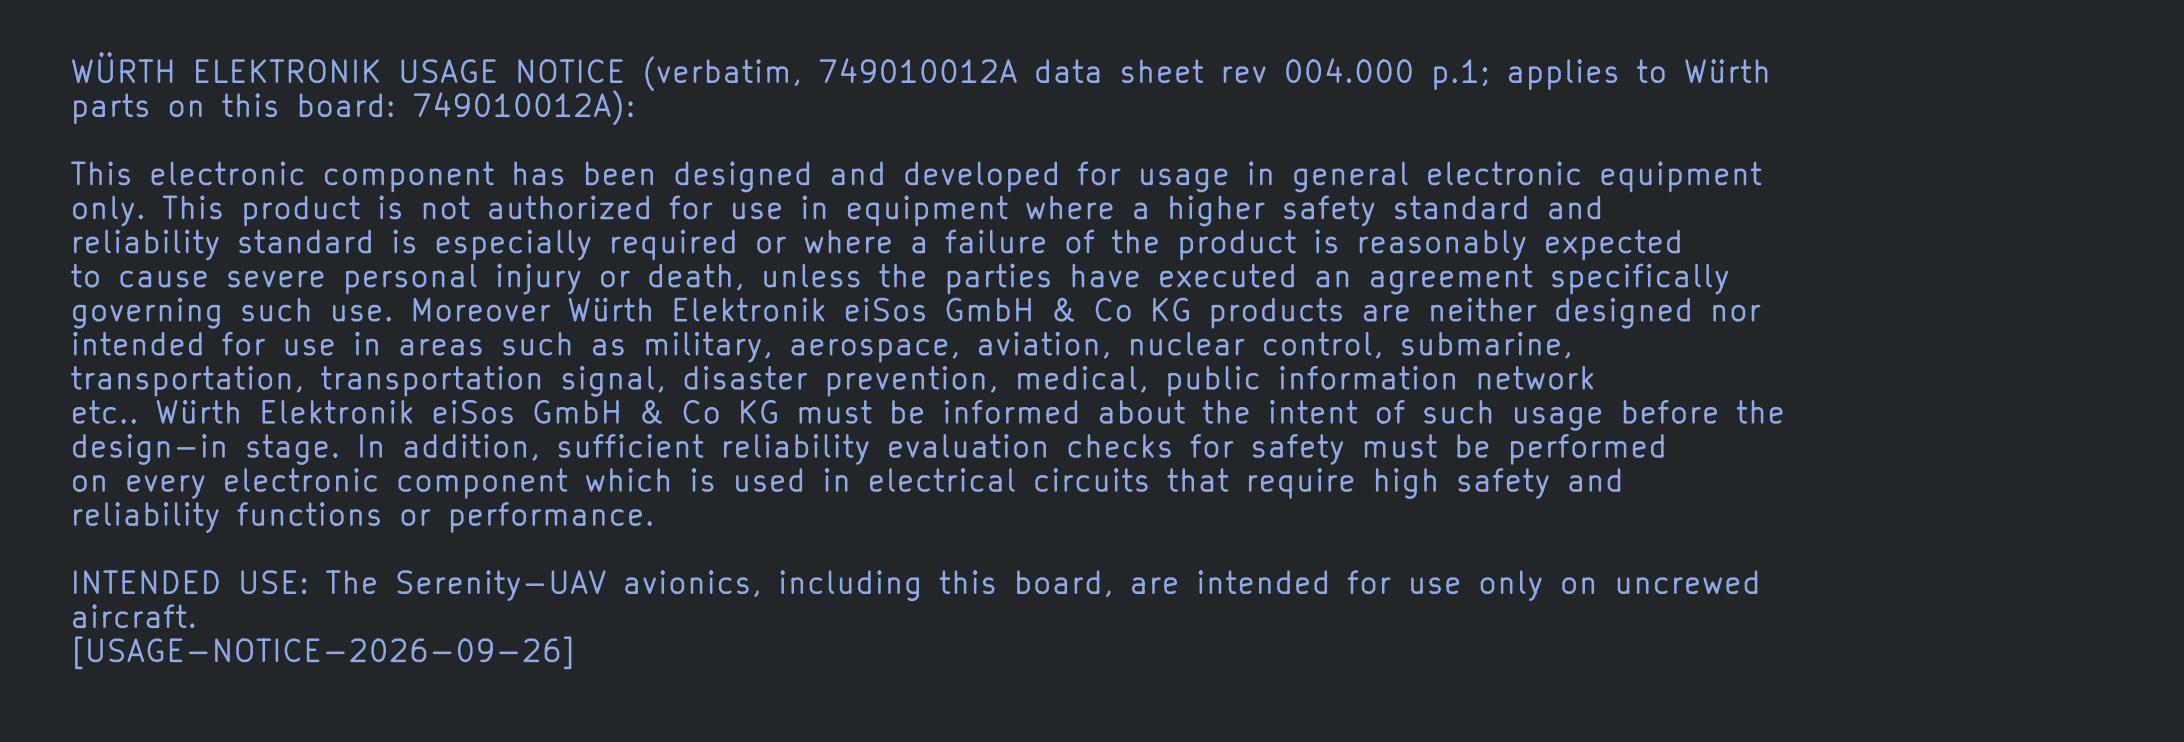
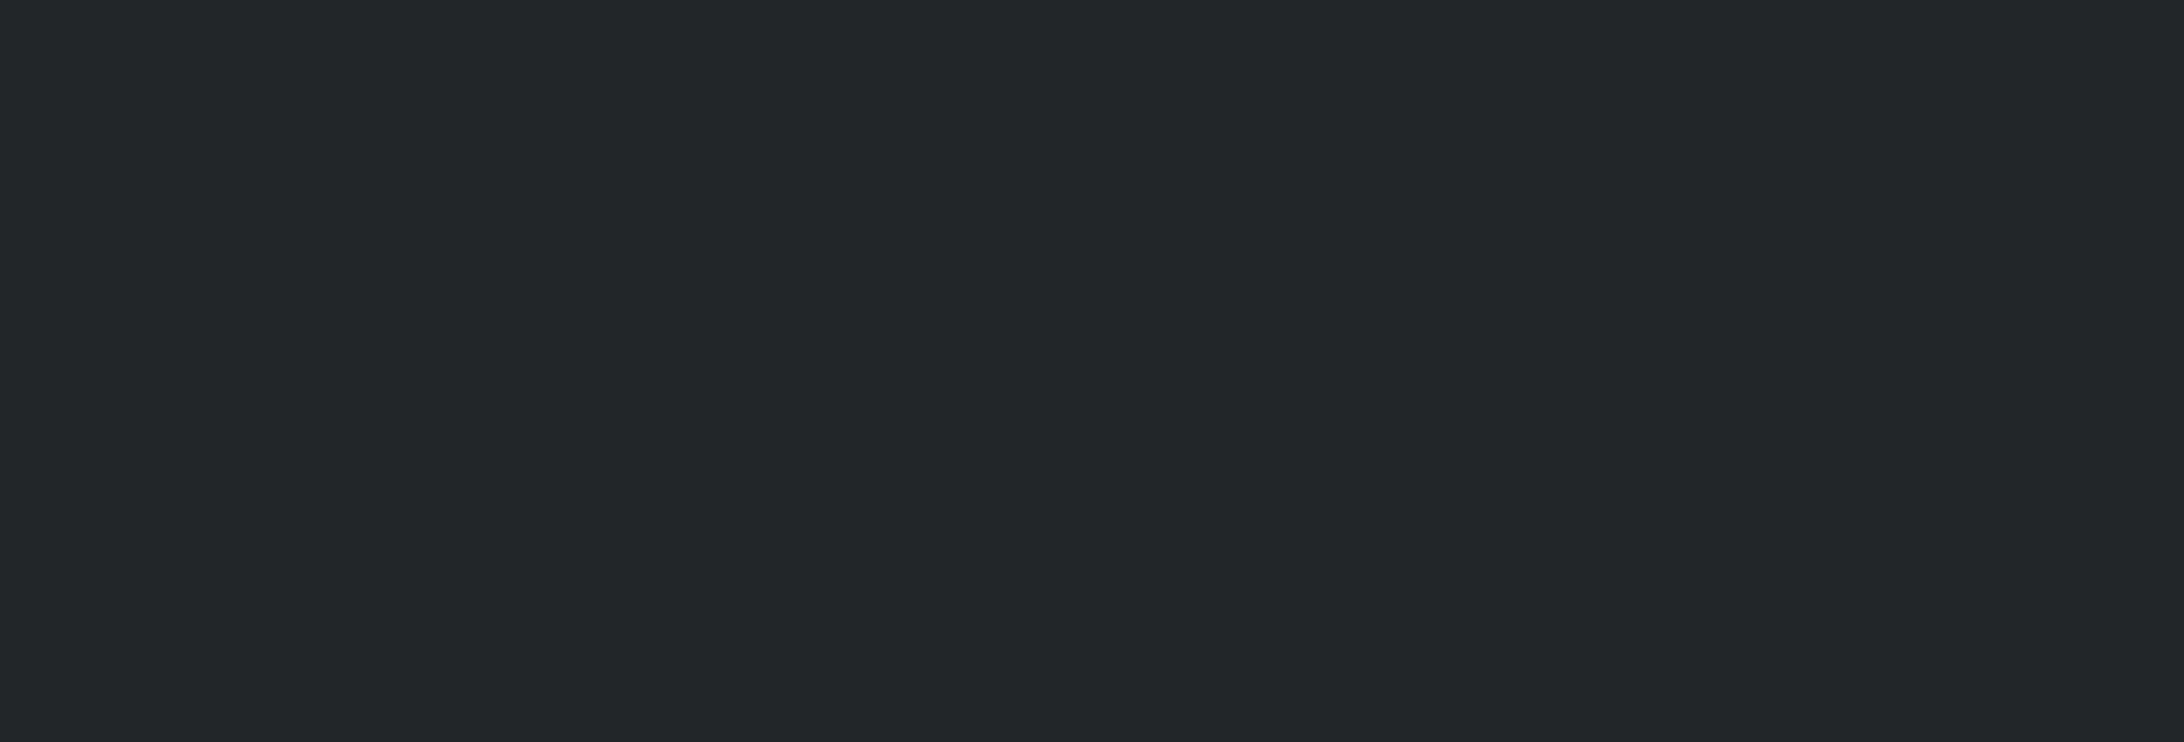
text: WÜRTH ELEKTRONIK USAGE NOTICE (verbatim, 749010012A data sheet rev 004.000 p.1; applies to Würth (919, 71) -> none
text: parts on this board: 749010012A): (353, 107) -> none
text: This electronic component has been designed and developed for usage in general electronic equipment (916, 176) -> none
text: only. This product is not authorized for use in equipment where a higher safety standard and (836, 210) -> none
text: reliability standard is especially required or where a failure of the product is reasonably expected (876, 245) -> none
text: to cause severe personal injury or death, unless the parties have executed an agreement specifically (899, 279) -> none
text: governing such use. Moreover Würth Elektronik eiSos GmbH & Co KG products are neither designed nor (916, 313) -> none
text: intended for use in areas such as military, aerospace, aviation, nuclear control, submarine, (821, 347) -> none
text: transportation, transportation signal, disaster prevention, medical, public information network (832, 381) -> none
text: etc.. Würth Elektronik eiSos GmbH & Co KG must be informed about the intent of such usage before the (927, 415) -> none
text: design-in stage. In addition, sufficient reliability evaluation checks for safety must be performed (868, 449) -> none
text: on every electronic component which is used in electrical circuits that require high safety and (846, 483) -> none
text: reliability functions or performance. (363, 517) -> none
text: INTENDED USE: The Serenity-UAV avionics, including this board, are intended for use only on uncrewed (915, 585) -> none
text: aircraft. (133, 616) -> none
text: [USAGE-NOTICE-2026-09-26] (323, 652) -> none

